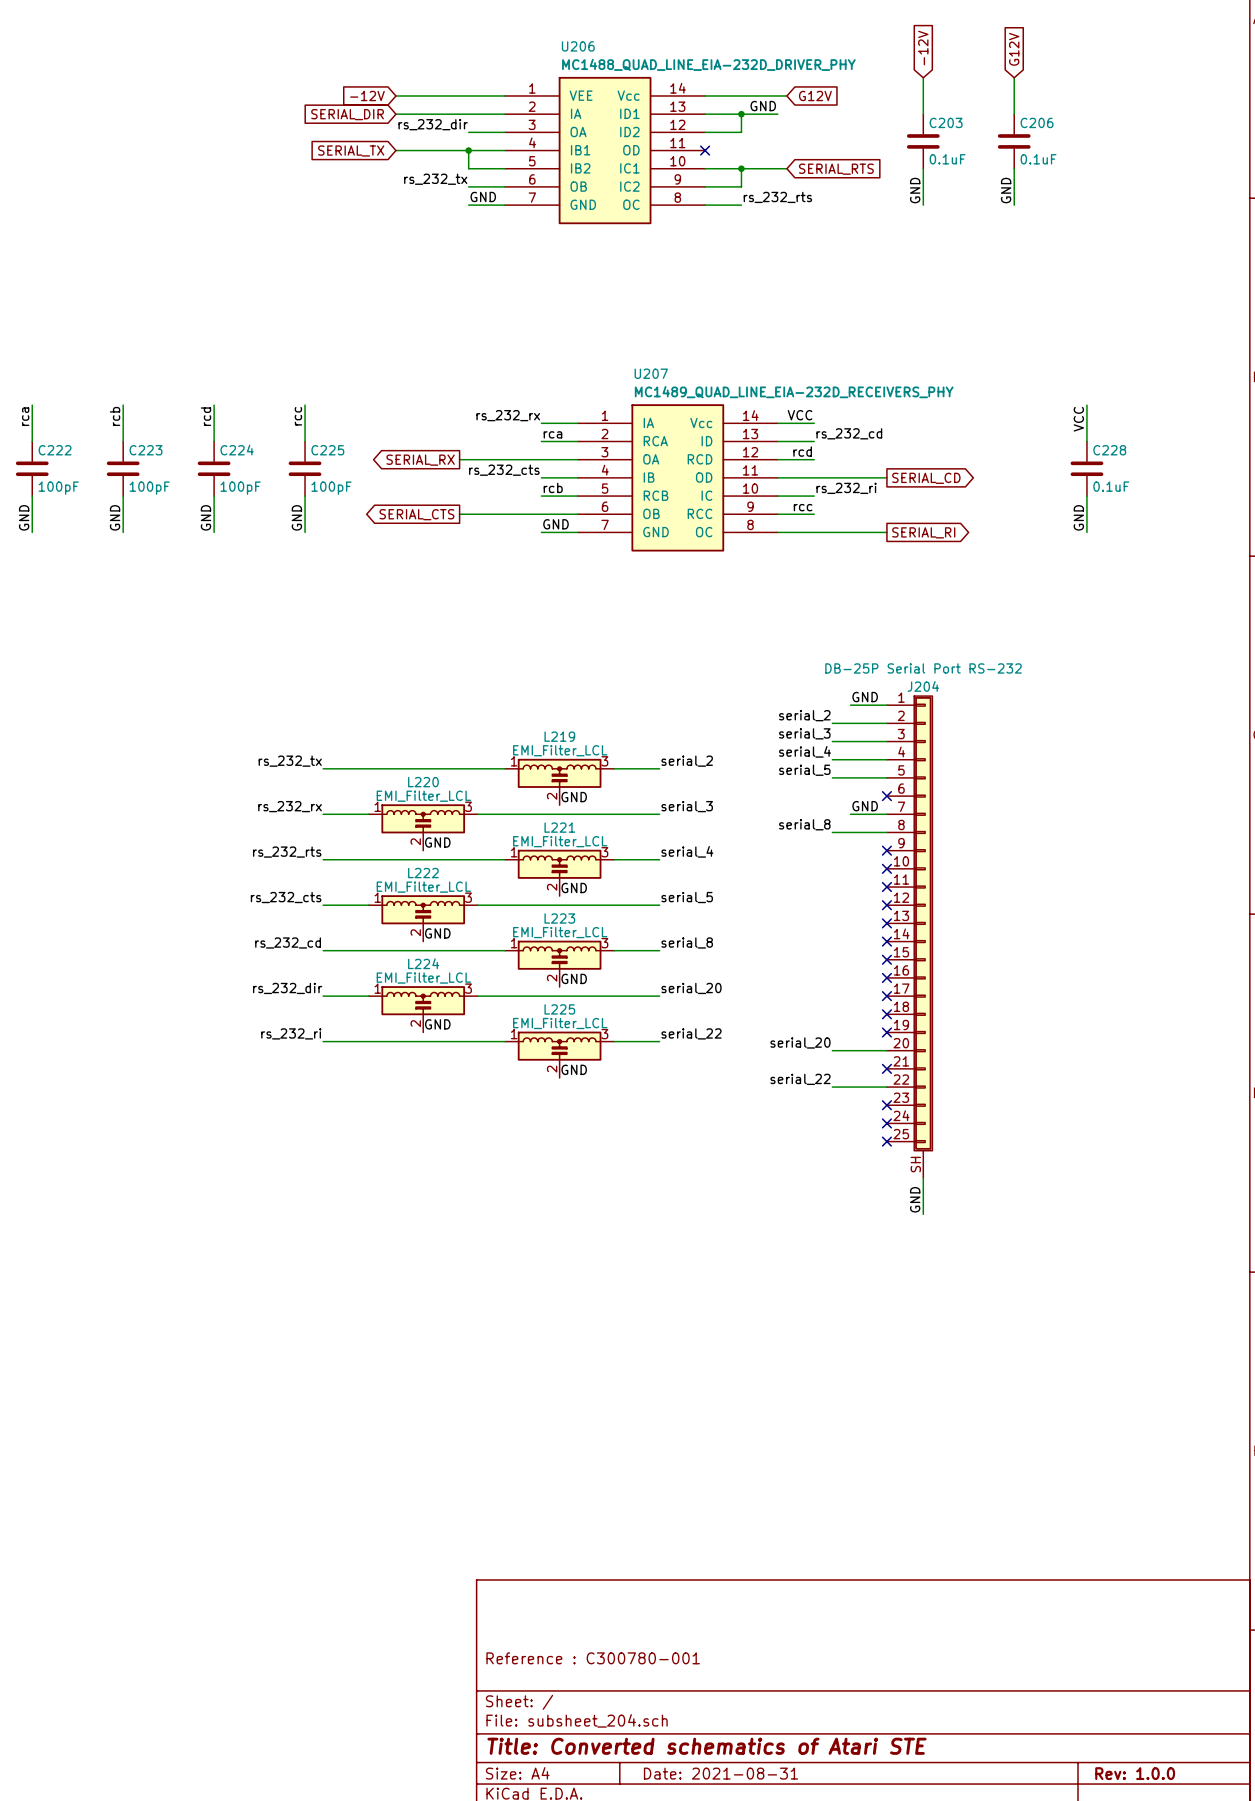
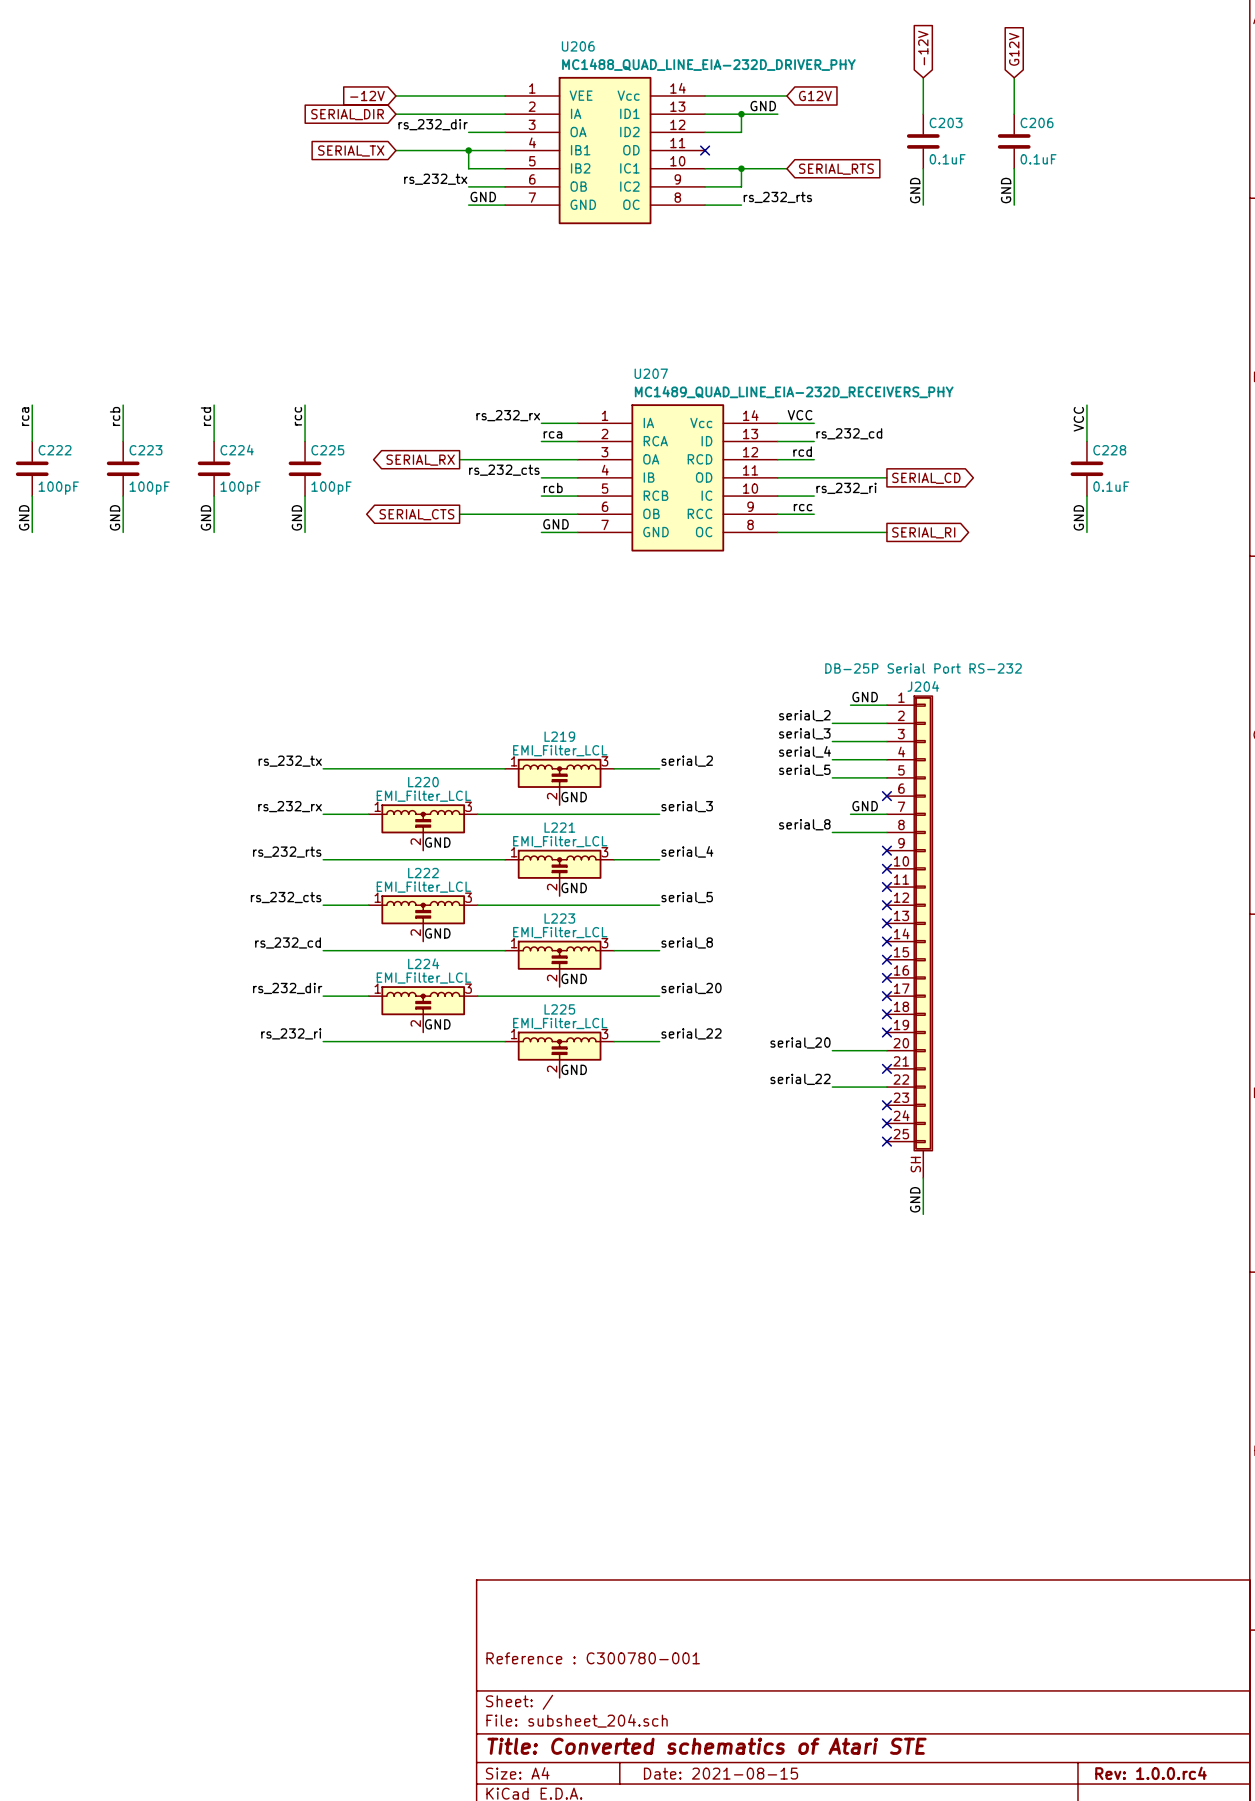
title block: Date: 2021-08-31 (721, 1773) -> Date: 2021-08-15 (721, 1773)
title block: Rev: 1.0.0 (1135, 1773) -> Rev: 1.0.0.rc4 (1151, 1773)

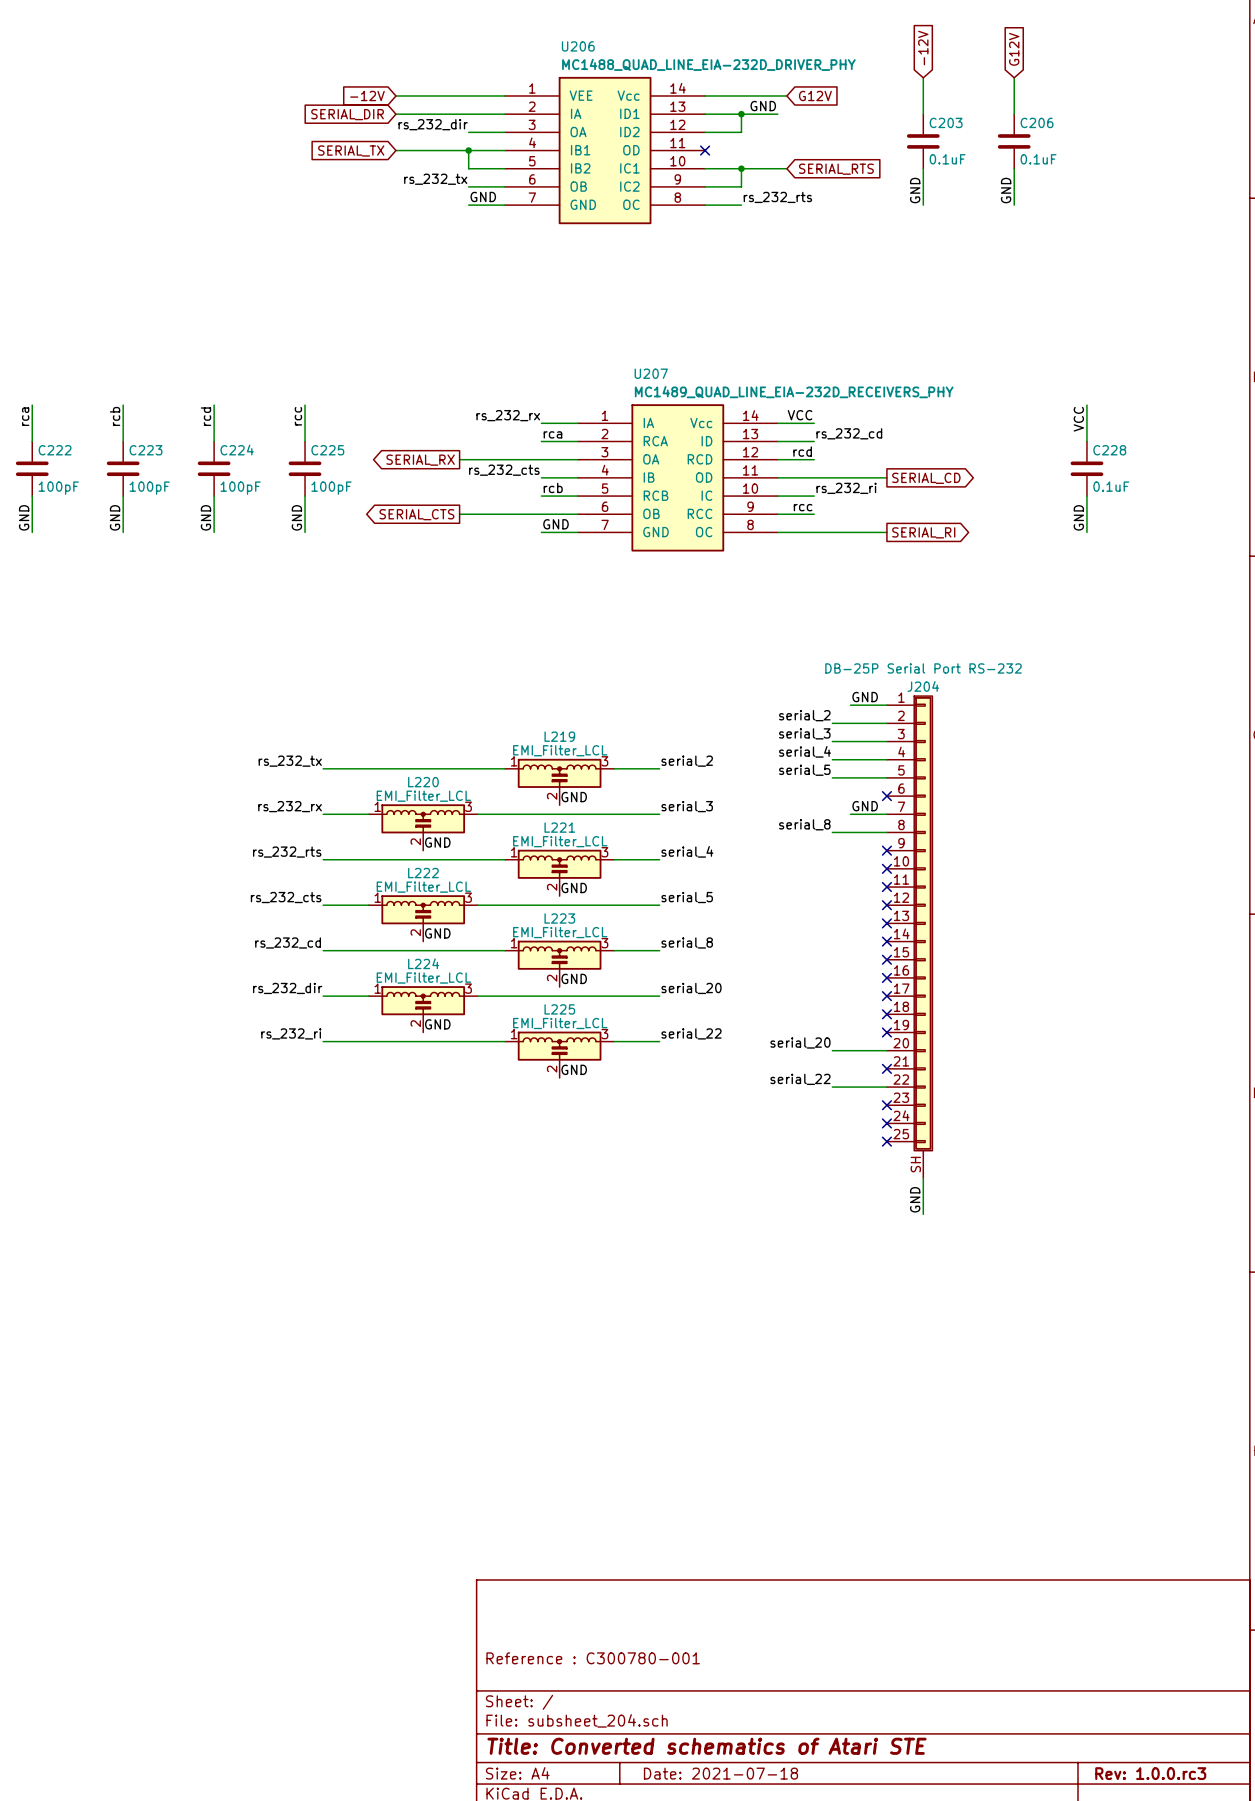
title block: Date: 2021-08-15 (721, 1773) -> Date: 2021-07-18 (721, 1773)
title block: Rev: 1.0.0.rc4 (1151, 1773) -> Rev: 1.0.0.rc3 (1150, 1773)

